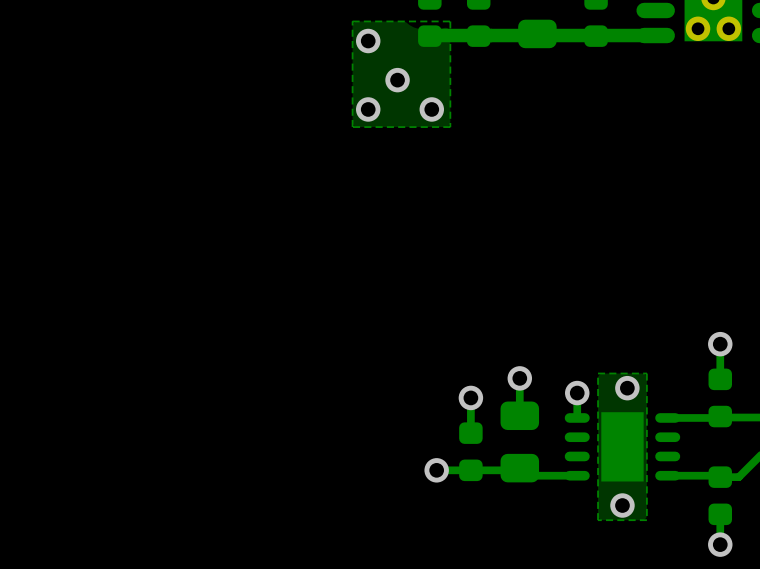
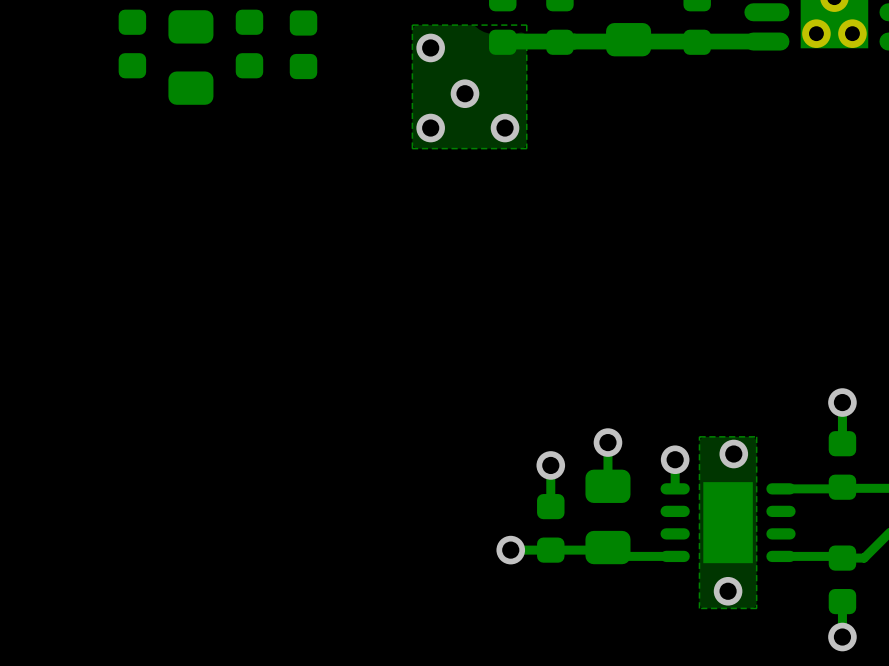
part: none -> (132, 44)
part: none -> (249, 44)
part: none -> (303, 44)
part: none -> (190, 57)

